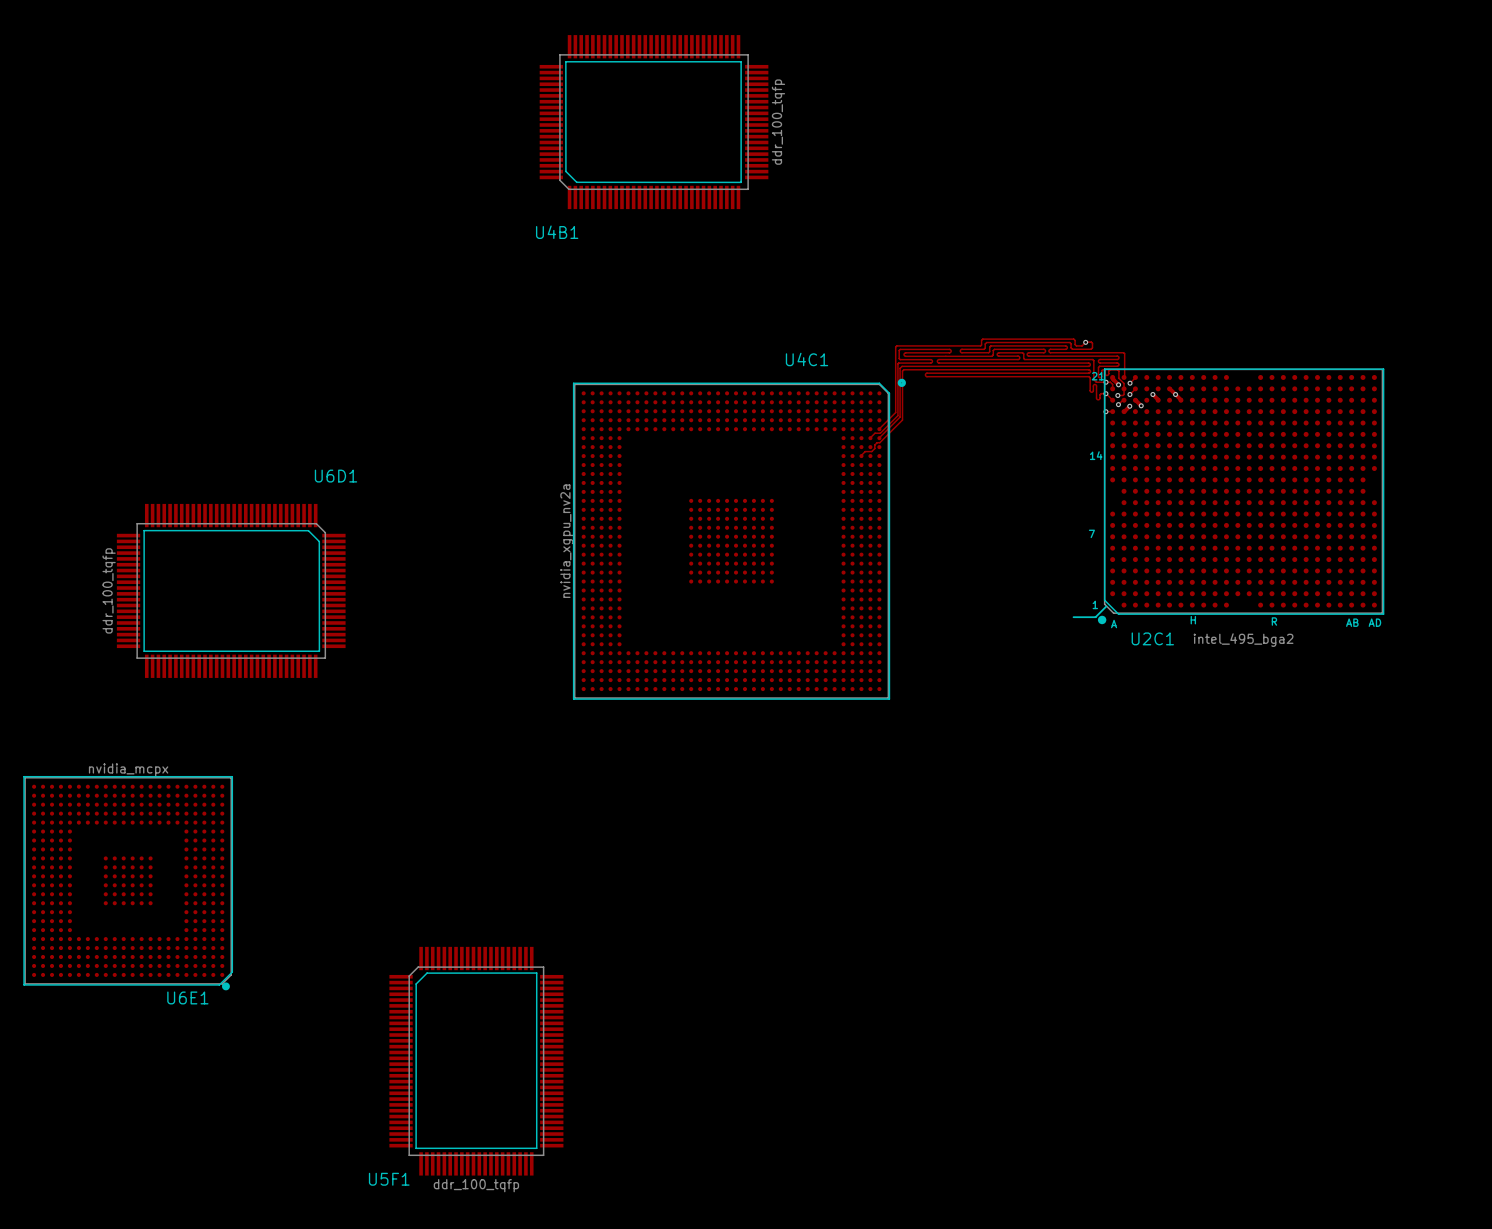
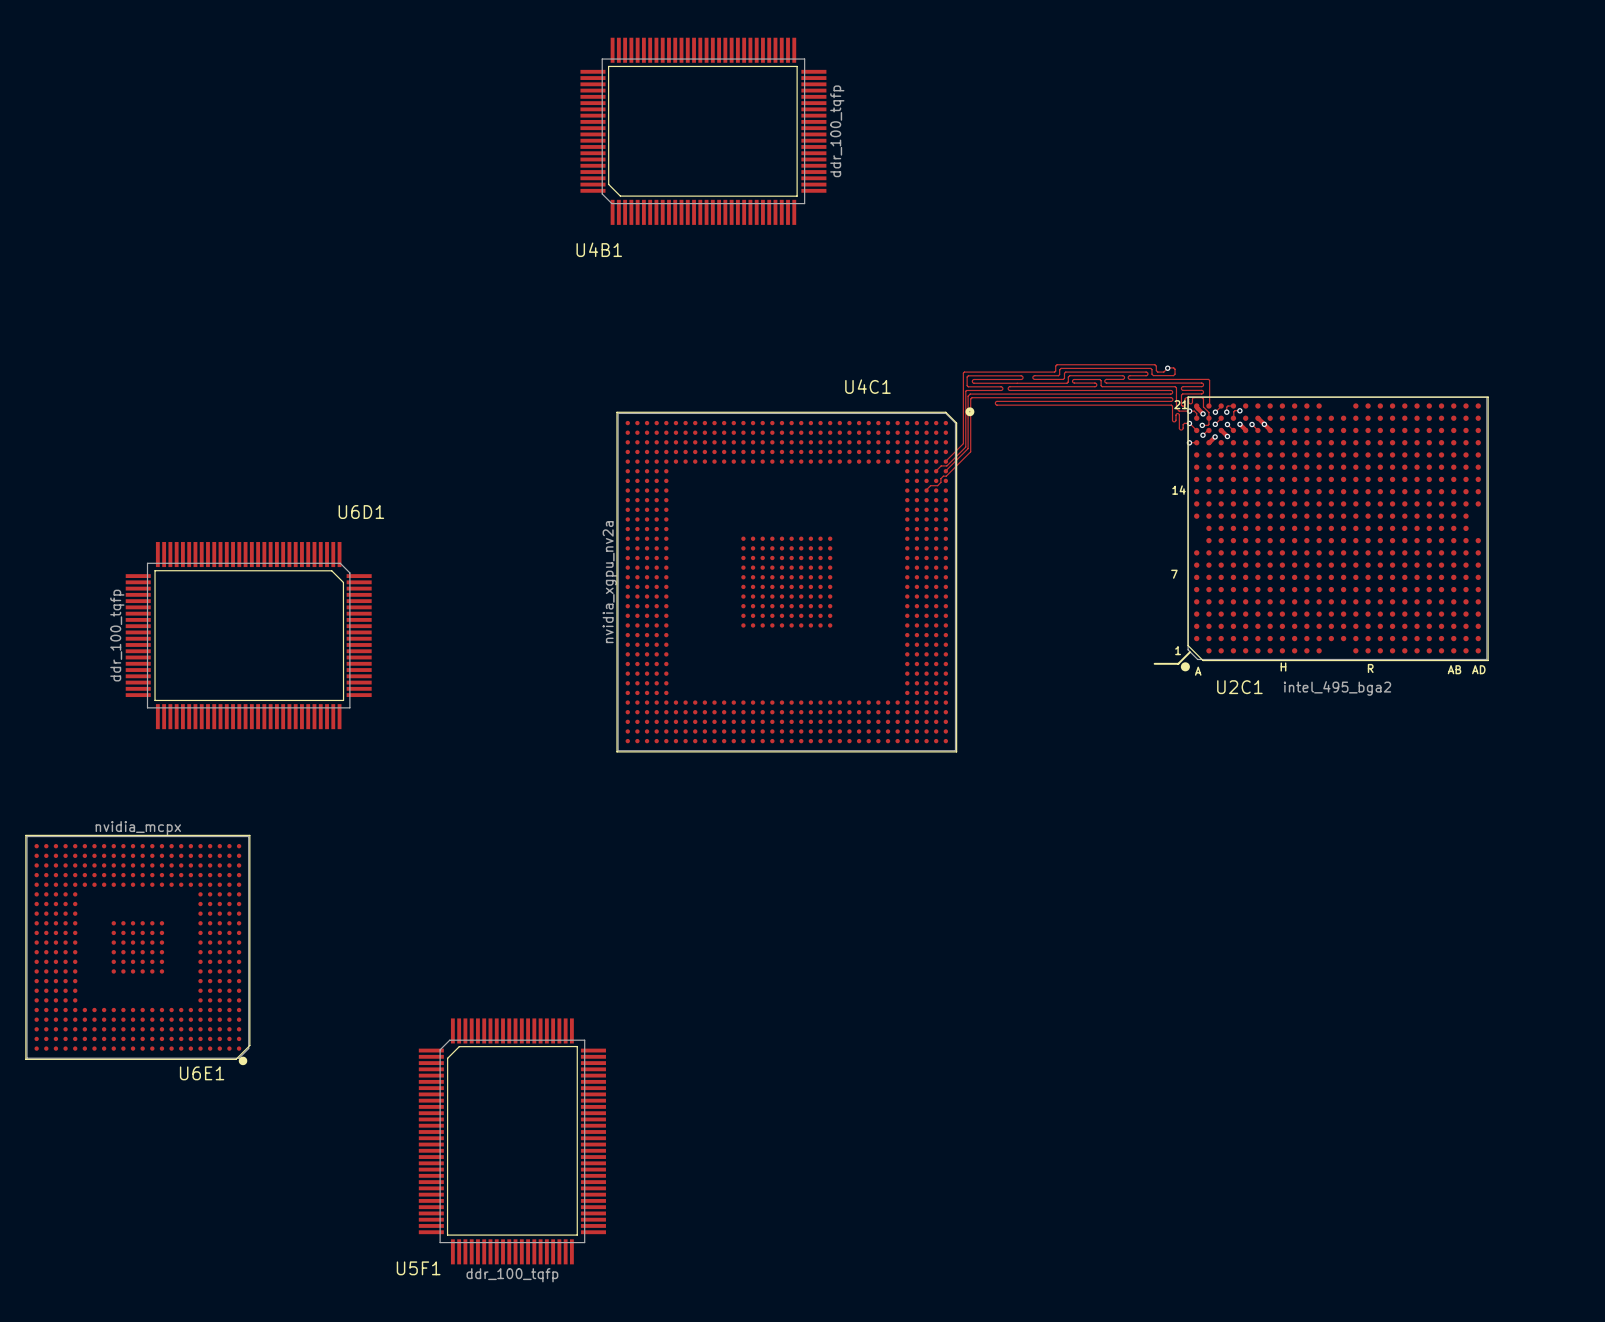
track: none -> (1233, 406) (1227, 406) (1226, 412)
track: none -> (1239, 410) (1233, 411) (1233, 418)
via: none -> (1239, 410)
via: none -> (1226, 412)
track: none -> (1227, 424) (1233, 430)
via: none -> (1227, 424)
track: none -> (1252, 424) (1257, 430)
via: none -> (1252, 424)

